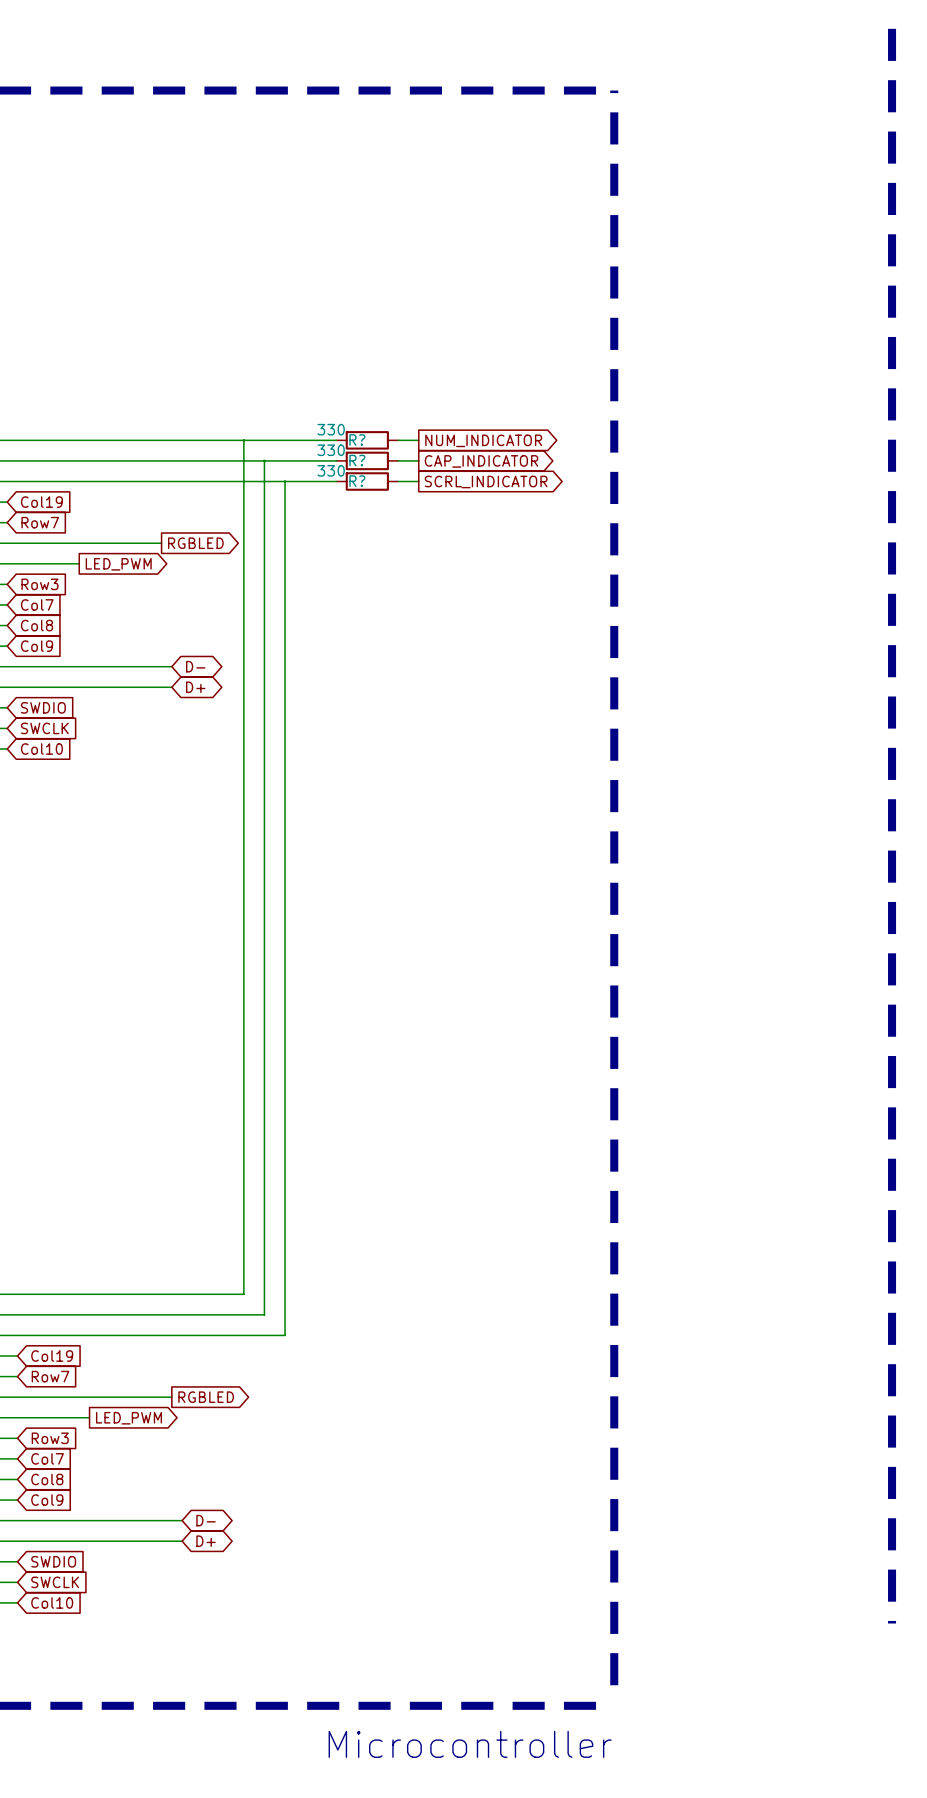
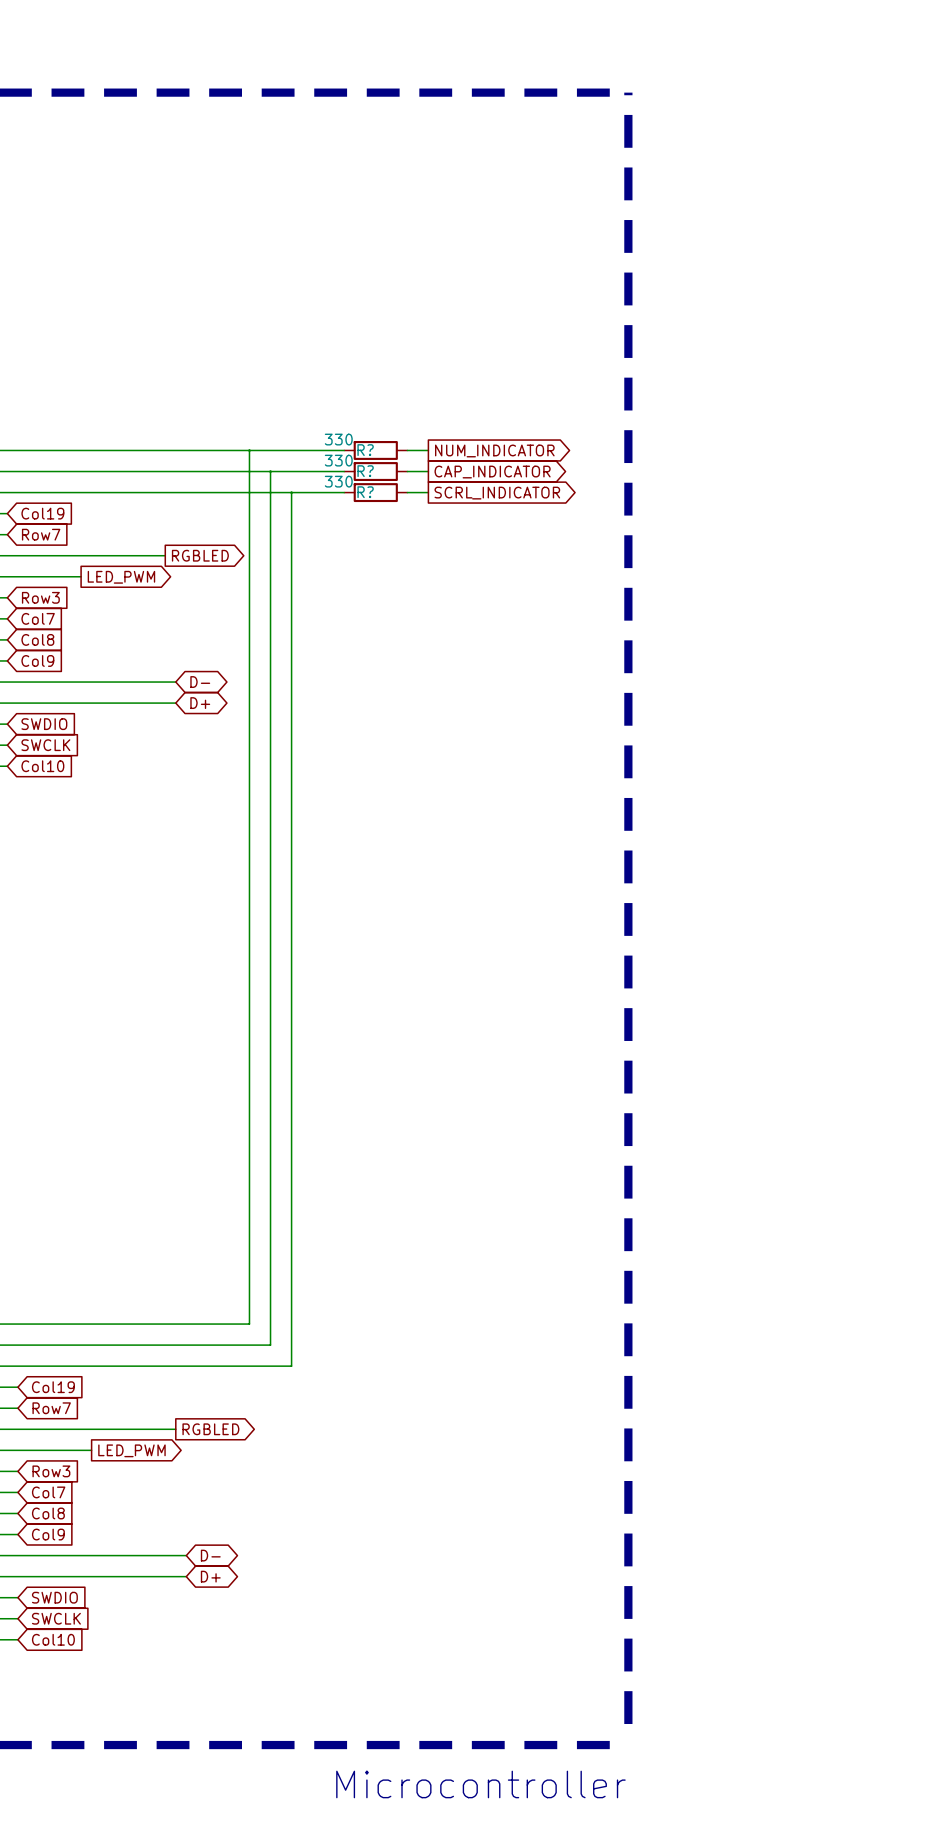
line: (892, 28) (892, 1623) -> none

